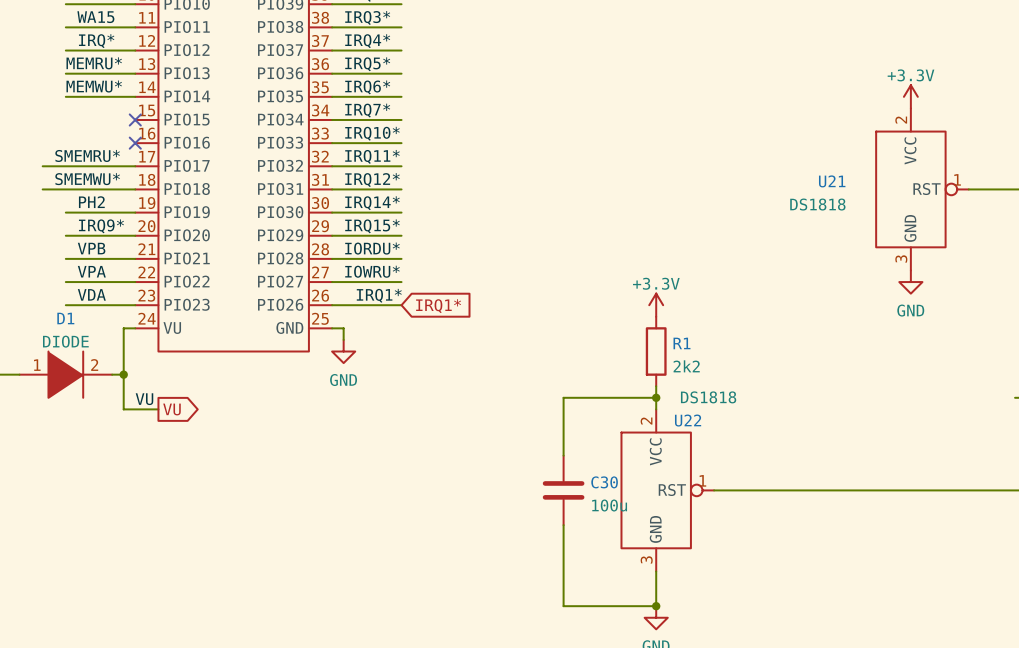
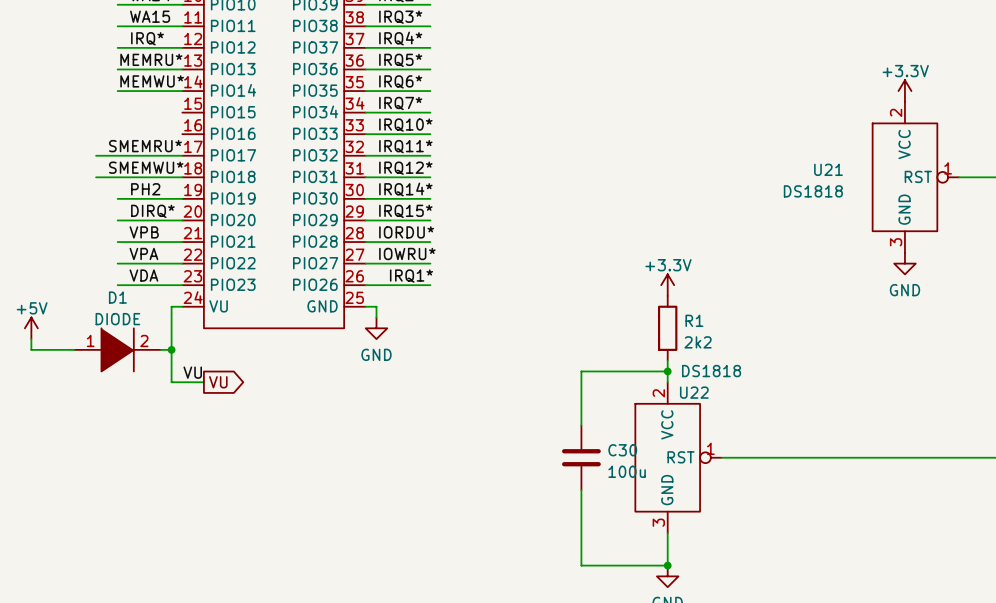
no-connect mark: (135, 119) -> none
no-connect mark: (135, 143) -> none
label: IRQ9* (101, 226) -> DIRQ* (152, 211)
global label: IRQ1* (438, 306) -> none

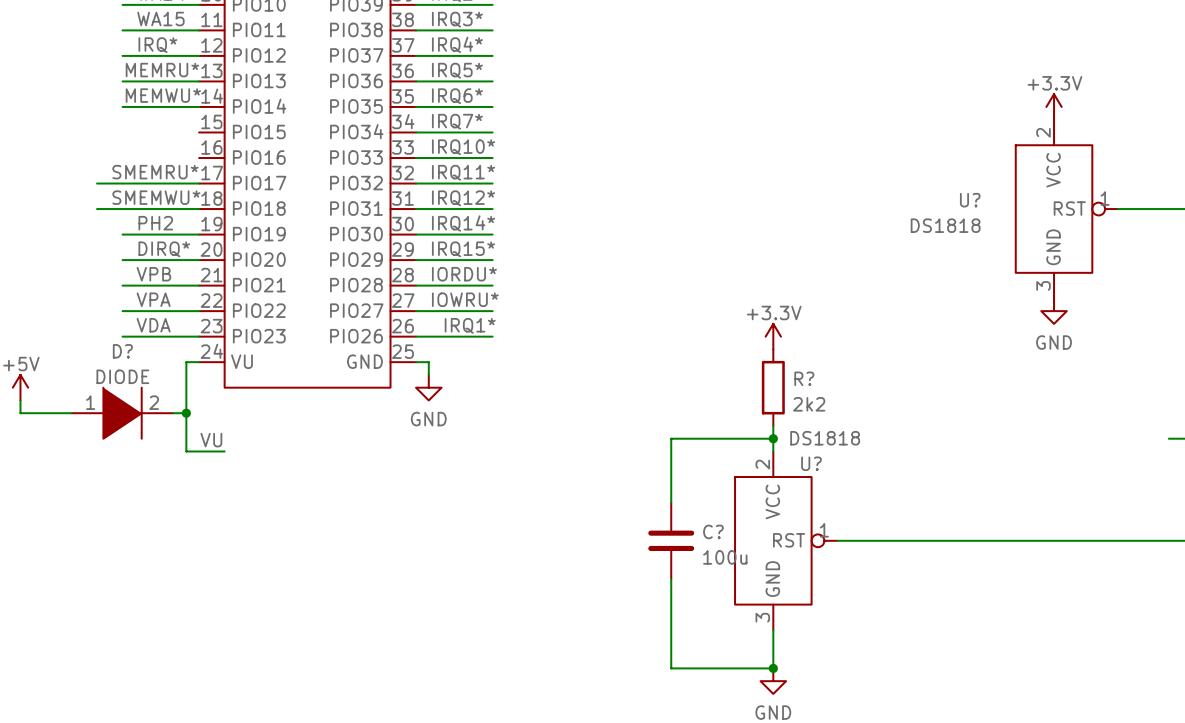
U21 name: U21 (828, 169) -> U? (970, 200)
D1 name: D1 (117, 297) -> D? (122, 351)
R1 name: R1 (694, 320) -> R? (804, 378)
global label: VU (218, 382) -> none
U22 name: U22 (694, 392) -> U? (811, 463)
C30 name: C30 (622, 450) -> C? (713, 531)

